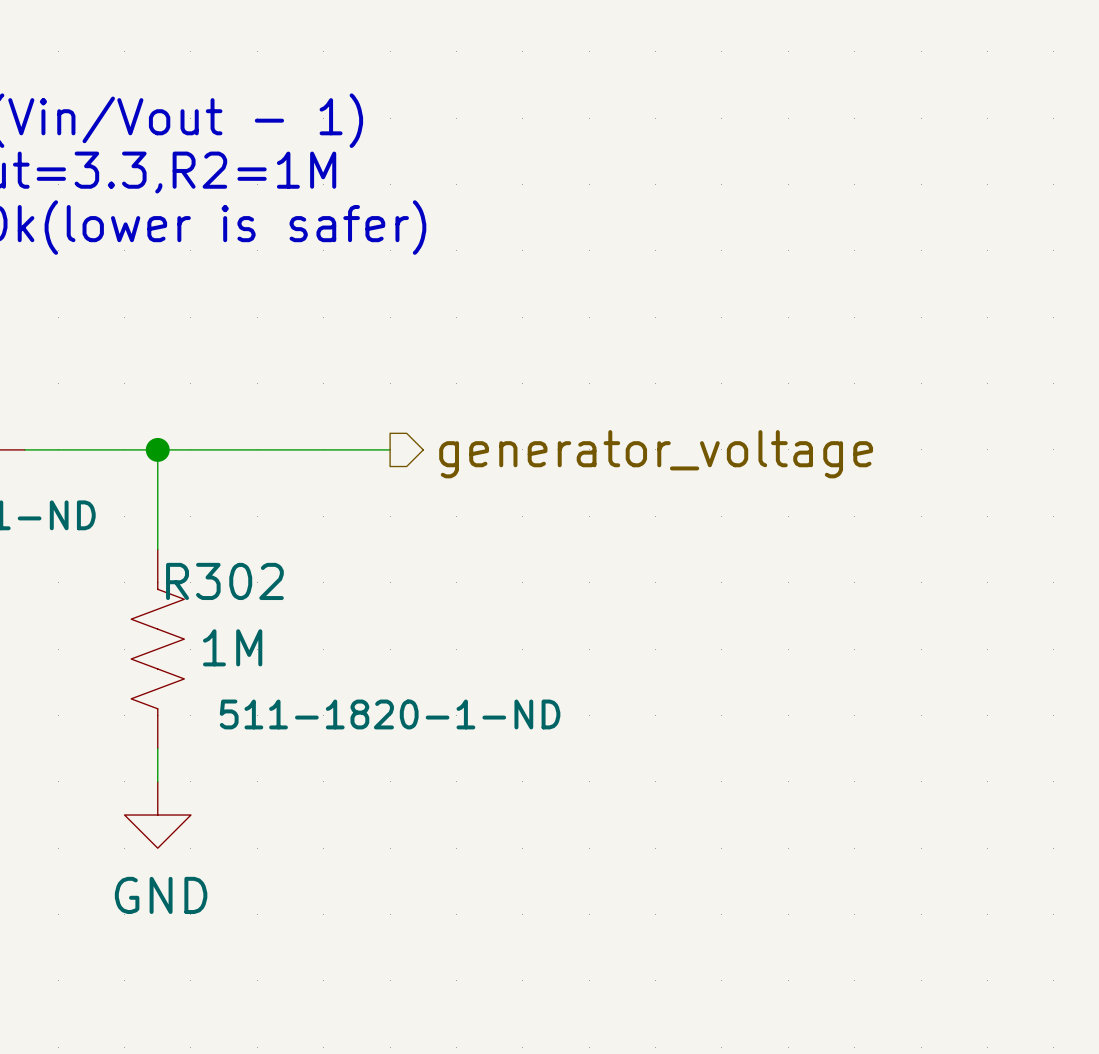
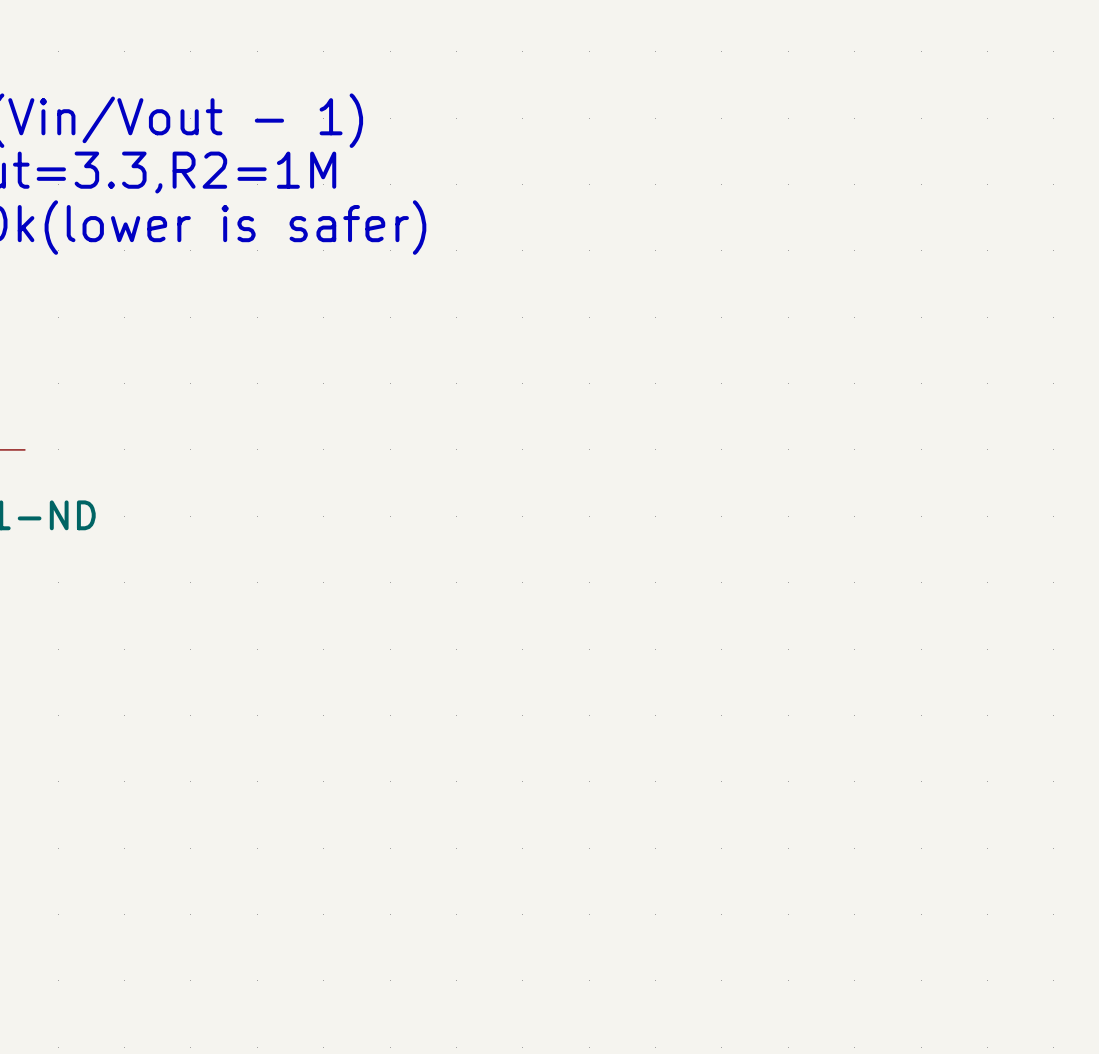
wire: (25, 449) (390, 449) -> none
wire: (157, 449) (157, 549) -> none
junction: (157, 449) -> none
hierarchical label: generator_voltage (656, 454) -> none
R302: 1M (157, 649) -> none
wire: (157, 748) (157, 781) -> none
power symbol: GND (157, 815) -> none

